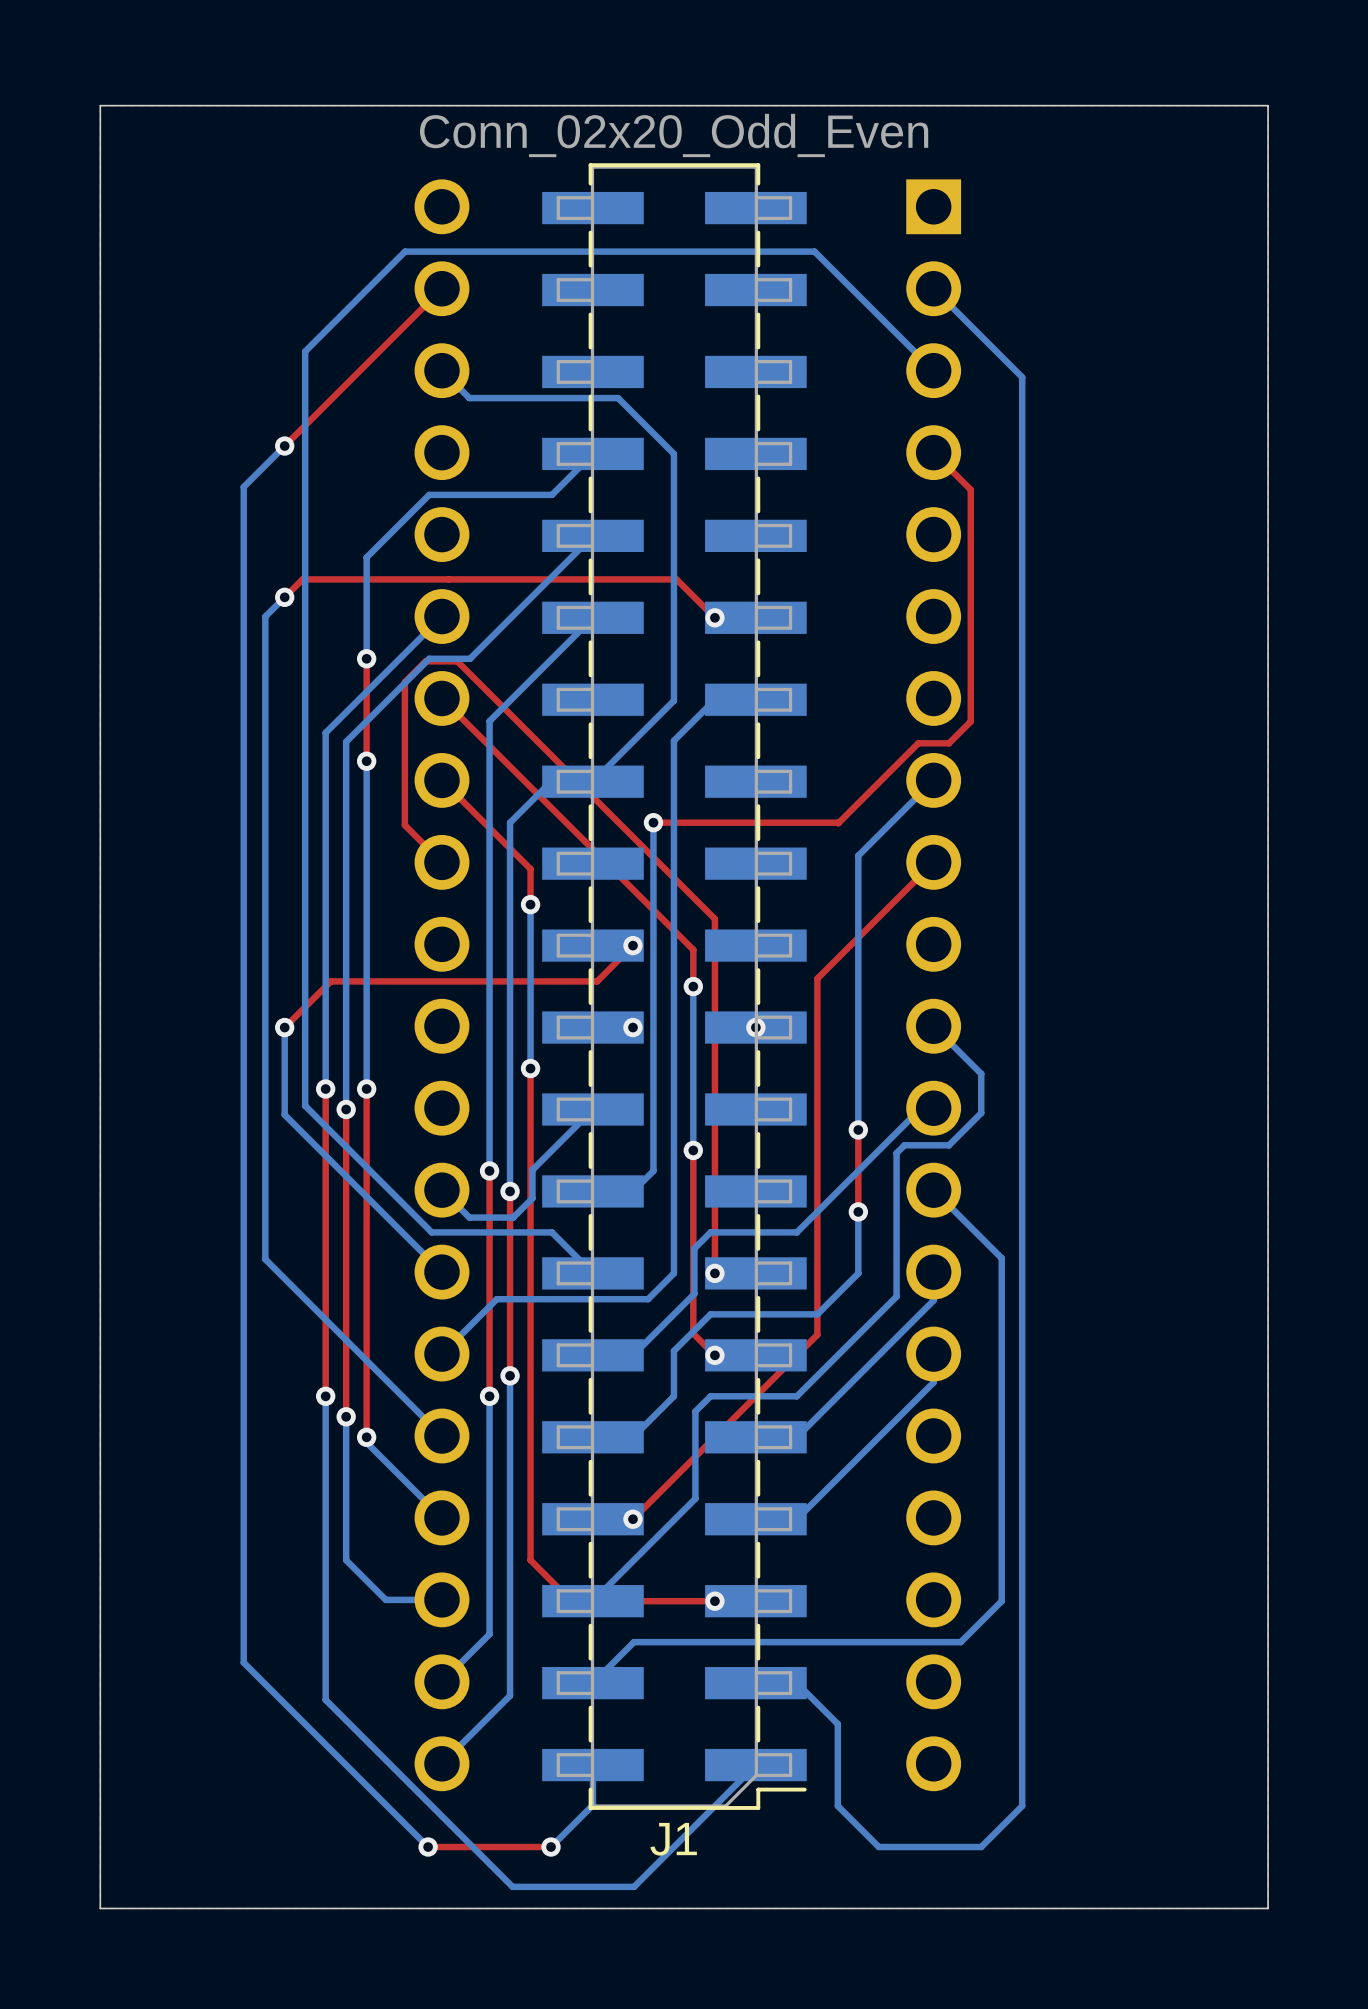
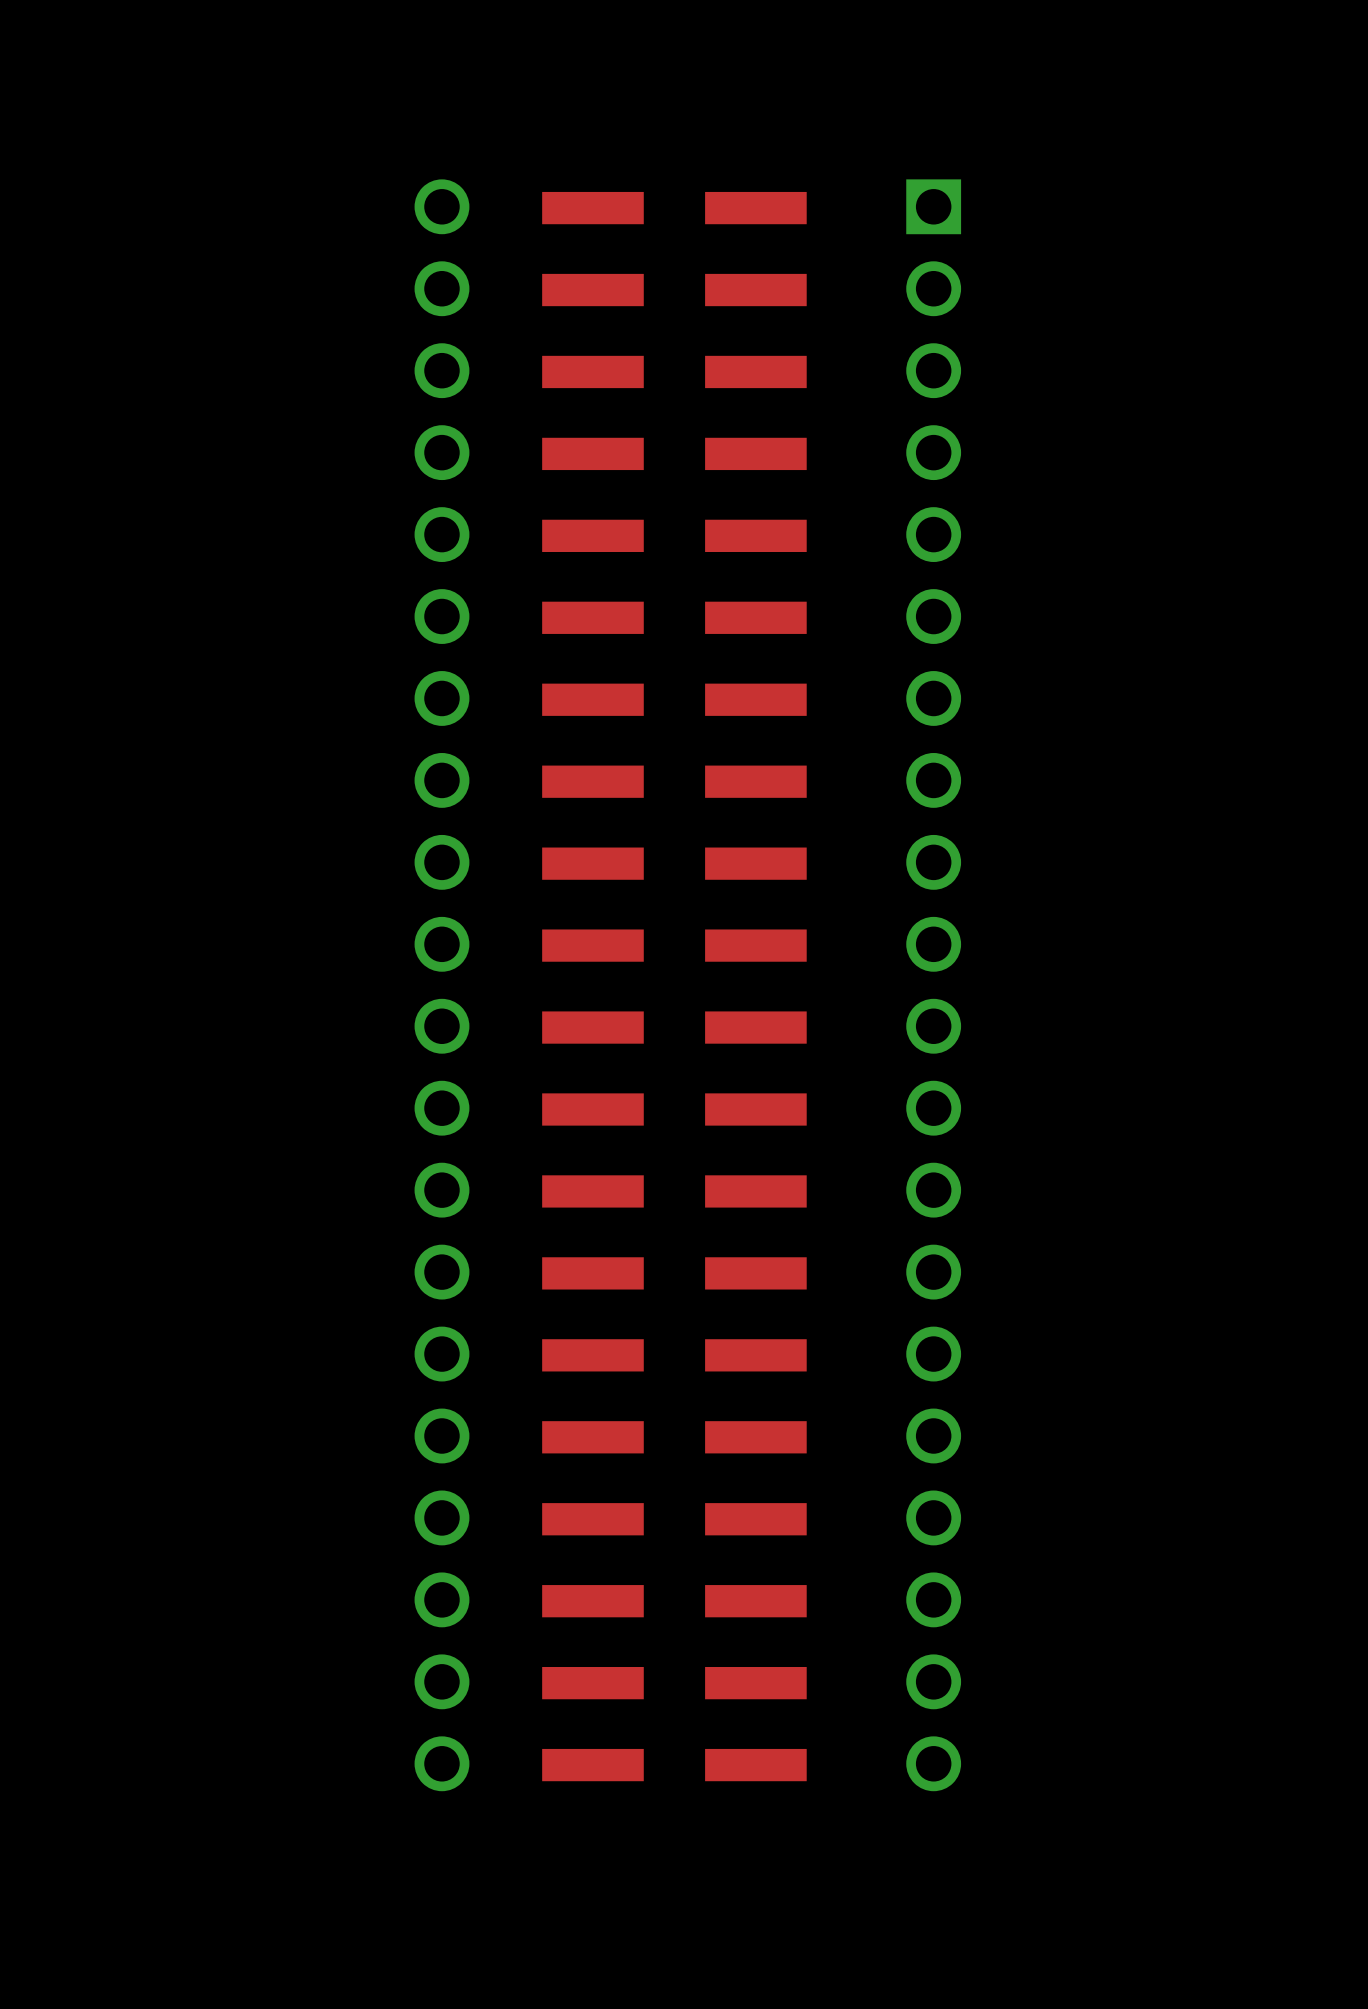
board edge: (1268, 105) (100, 105) (100, 1908) (1268, 1908) (1268, 105) -> none
top track: (441, 288) (284, 446) -> none
bottom track: (933, 288) (1022, 377) (1022, 1806) (981, 1847) (878, 1847) (837, 1806) (837, 1724) (796, 1683) (755, 1683) -> none
bottom track: (441, 370) (469, 398) (618, 398) (673, 453) (673, 700) (592, 781) (551, 781) (510, 822) (510, 1191) -> none
bottom track: (933, 370) (814, 251) (405, 251) (305, 351) (305, 1105) (431, 1232) (552, 1232) (592, 1273) -> none
bottom track: (284, 446) (243, 486) (243, 1662) (428, 1847) -> none
via: (284, 446) -> none
top track: (933, 452) (970, 489) (970, 721) (949, 743) (918, 743) (838, 823) (653, 822) -> none
bottom track: (592, 453) (552, 494) (429, 494) (366, 557) (366, 658) -> none
bottom track: (592, 535) (470, 658) (429, 658) (346, 741) (346, 1109) -> none
bottom track: (284, 597) (265, 616) (265, 1259) (441, 1435) -> none
top track: (284, 597) (302, 579) (676, 579) (714, 617) -> none
via: (284, 597) -> none
bottom track: (441, 616) (325, 732) (325, 1089) -> none
bottom track: (592, 617) (489, 721) (489, 1170) -> none
via: (714, 617) -> none
top track: (366, 658) (366, 761) -> none
via: (366, 658) -> none
top track: (441, 698) (693, 949) (693, 986) -> none
bottom track: (755, 699) (714, 699) (673, 740) (673, 1273) (648, 1299) (496, 1299) (441, 1354) -> none
bottom track: (366, 761) (366, 1089) -> none
via: (366, 761) -> none
top track: (441, 780) (530, 868) (530, 904) -> none
bottom track: (933, 780) (858, 855) (858, 1129) -> none
bottom track: (653, 822) (653, 1170) (632, 1191) (592, 1191) -> none
via: (653, 822) -> none
top track: (441, 862) (404, 825) (404, 682) (425, 661) (457, 661) (714, 918) (714, 1273) -> none
top track: (933, 862) (817, 978) (817, 1334) (632, 1519) -> none
bottom track: (530, 904) (530, 1068) -> none
via: (530, 904) -> none
top track: (632, 945) (597, 981) (330, 981) (284, 1027) -> none
via: (632, 945) -> none
J1 side: bottom (674, 986) -> top (674, 986)
bottom track: (693, 986) (693, 1150) -> none
via: (693, 986) -> none
bottom track: (933, 1026) (981, 1073) (981, 1113) (949, 1145) (904, 1145) (896, 1153) (896, 1296) (796, 1396) (710, 1396) (695, 1411) (695, 1498) (592, 1601) -> none
bottom track: (284, 1027) (284, 1114) (441, 1272) -> none
via: (284, 1027) -> none
via: (632, 1027) -> none
via: (755, 1027) -> none
top track: (530, 1068) (530, 1560) (571, 1601) (714, 1601) -> none
via: (530, 1068) -> none
top track: (325, 1089) (325, 1396) -> none
via: (325, 1089) -> none
top track: (366, 1089) (366, 1437) -> none
via: (366, 1089) -> none
bottom track: (933, 1108) (921, 1108) (796, 1232) (710, 1232) (694, 1248) (694, 1293) (632, 1355) (592, 1355) -> none
top track: (346, 1109) (346, 1416) -> none
via: (346, 1109) -> none
bottom track: (592, 1109) (532, 1169) (532, 1198) (513, 1217) (469, 1217) (441, 1190) -> none
top track: (858, 1129) (858, 1211) -> none
via: (858, 1129) -> none
top track: (693, 1150) (693, 1333) (714, 1355) -> none
via: (693, 1150) -> none
top track: (489, 1170) (489, 1396) -> none
via: (489, 1170) -> none
bottom track: (933, 1190) (1001, 1258) (1001, 1601) (960, 1642) (633, 1642) (592, 1683) -> none
top track: (510, 1191) (510, 1375) -> none
via: (510, 1191) -> none
bottom track: (858, 1211) (858, 1273) (817, 1314) (710, 1314) (673, 1350) (673, 1396) (632, 1437) (592, 1437) -> none
via: (858, 1211) -> none
bottom track: (933, 1272) (933, 1300) (796, 1437) (755, 1437) -> none
via: (714, 1273) -> none
bottom track: (933, 1354) (933, 1382) (796, 1519) (755, 1519) -> none
via: (714, 1355) -> none
bottom track: (510, 1375) (510, 1695) (441, 1763) -> none
via: (510, 1375) -> none
bottom track: (325, 1396) (325, 1699) (512, 1886) (634, 1886) (755, 1765) -> none
via: (325, 1396) -> none
bottom track: (489, 1396) (489, 1634) (441, 1681) -> none
via: (489, 1396) -> none
bottom track: (346, 1416) (346, 1560) (385, 1599) (441, 1599) -> none
via: (346, 1416) -> none
bottom track: (366, 1437) (366, 1442) (441, 1517) -> none
via: (366, 1437) -> none
via: (632, 1519) -> none
via: (714, 1601) -> none
bottom track: (592, 1765) (592, 1805) (551, 1847) -> none
via: (428, 1847) -> none
top track: (551, 1847) (428, 1847) -> none
via: (551, 1847) -> none

